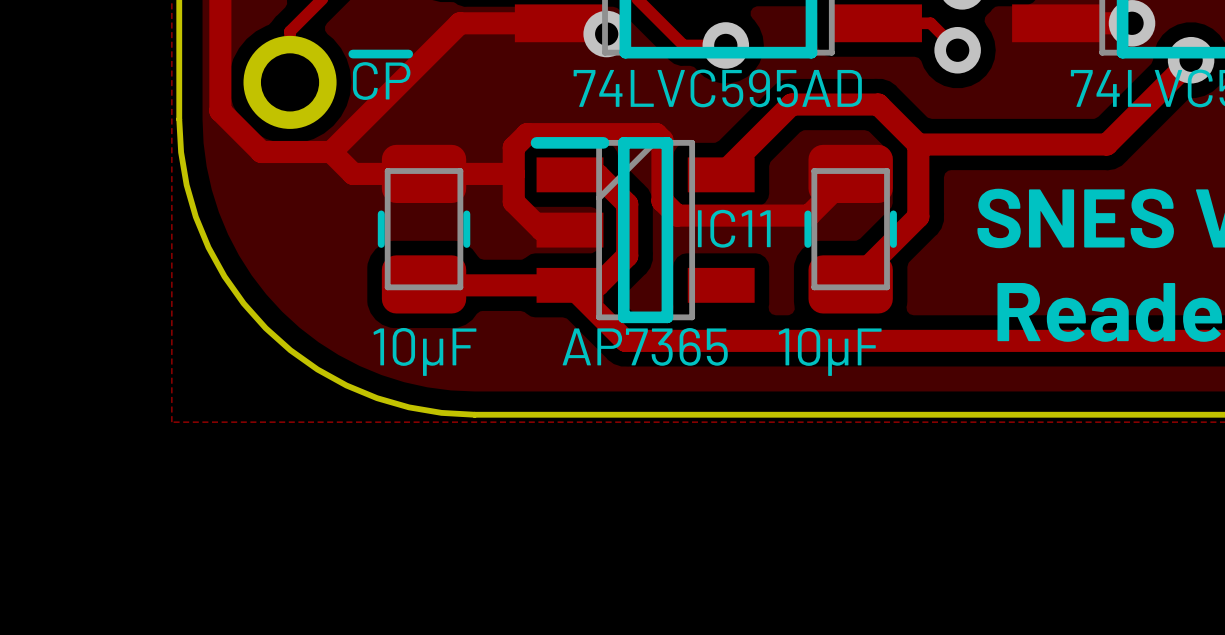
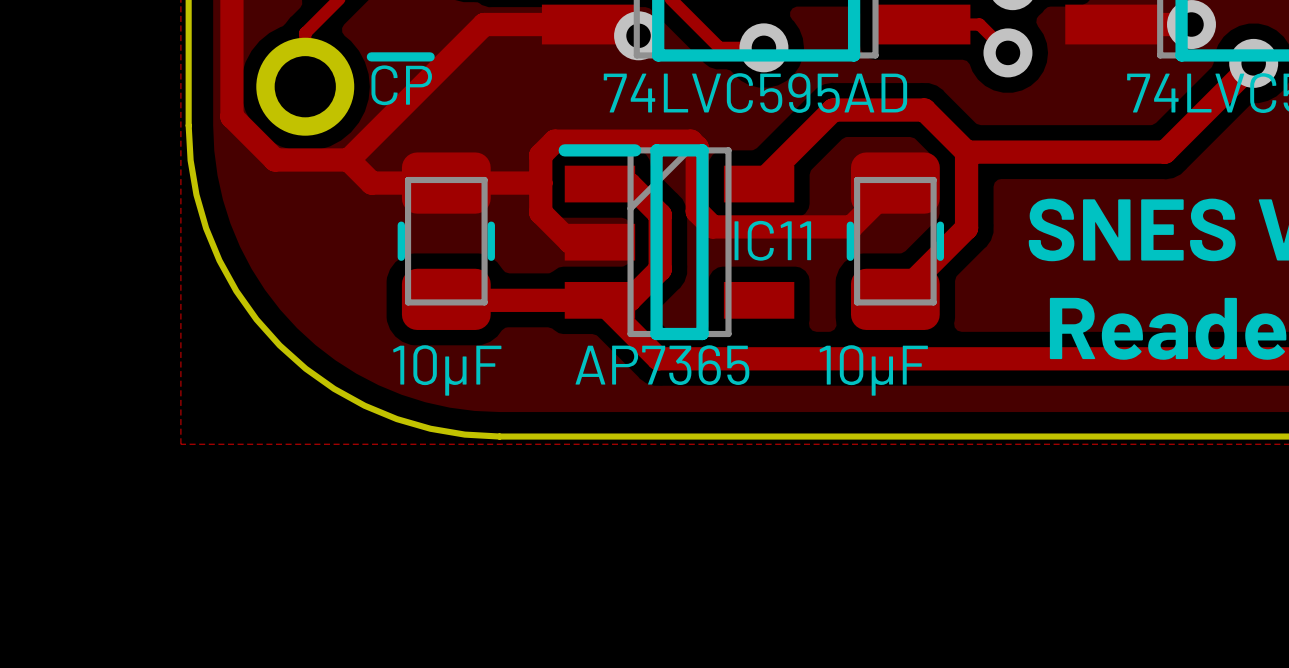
IC11 text position: AP7365 (645, 346) -> AP7365 (662, 365)

